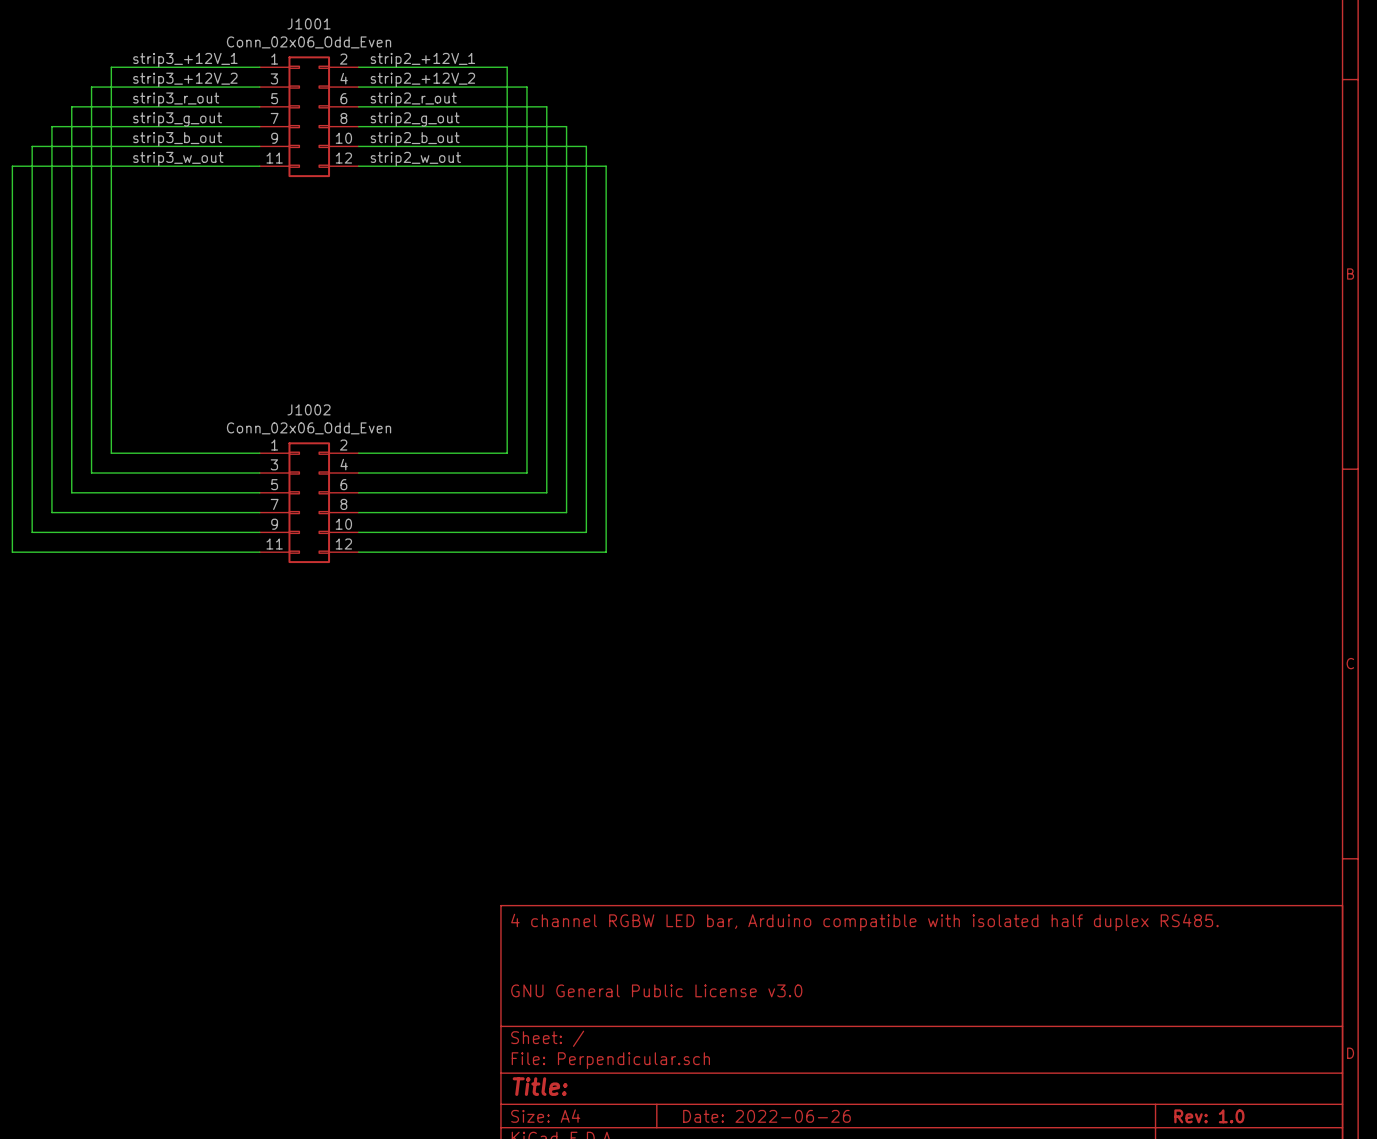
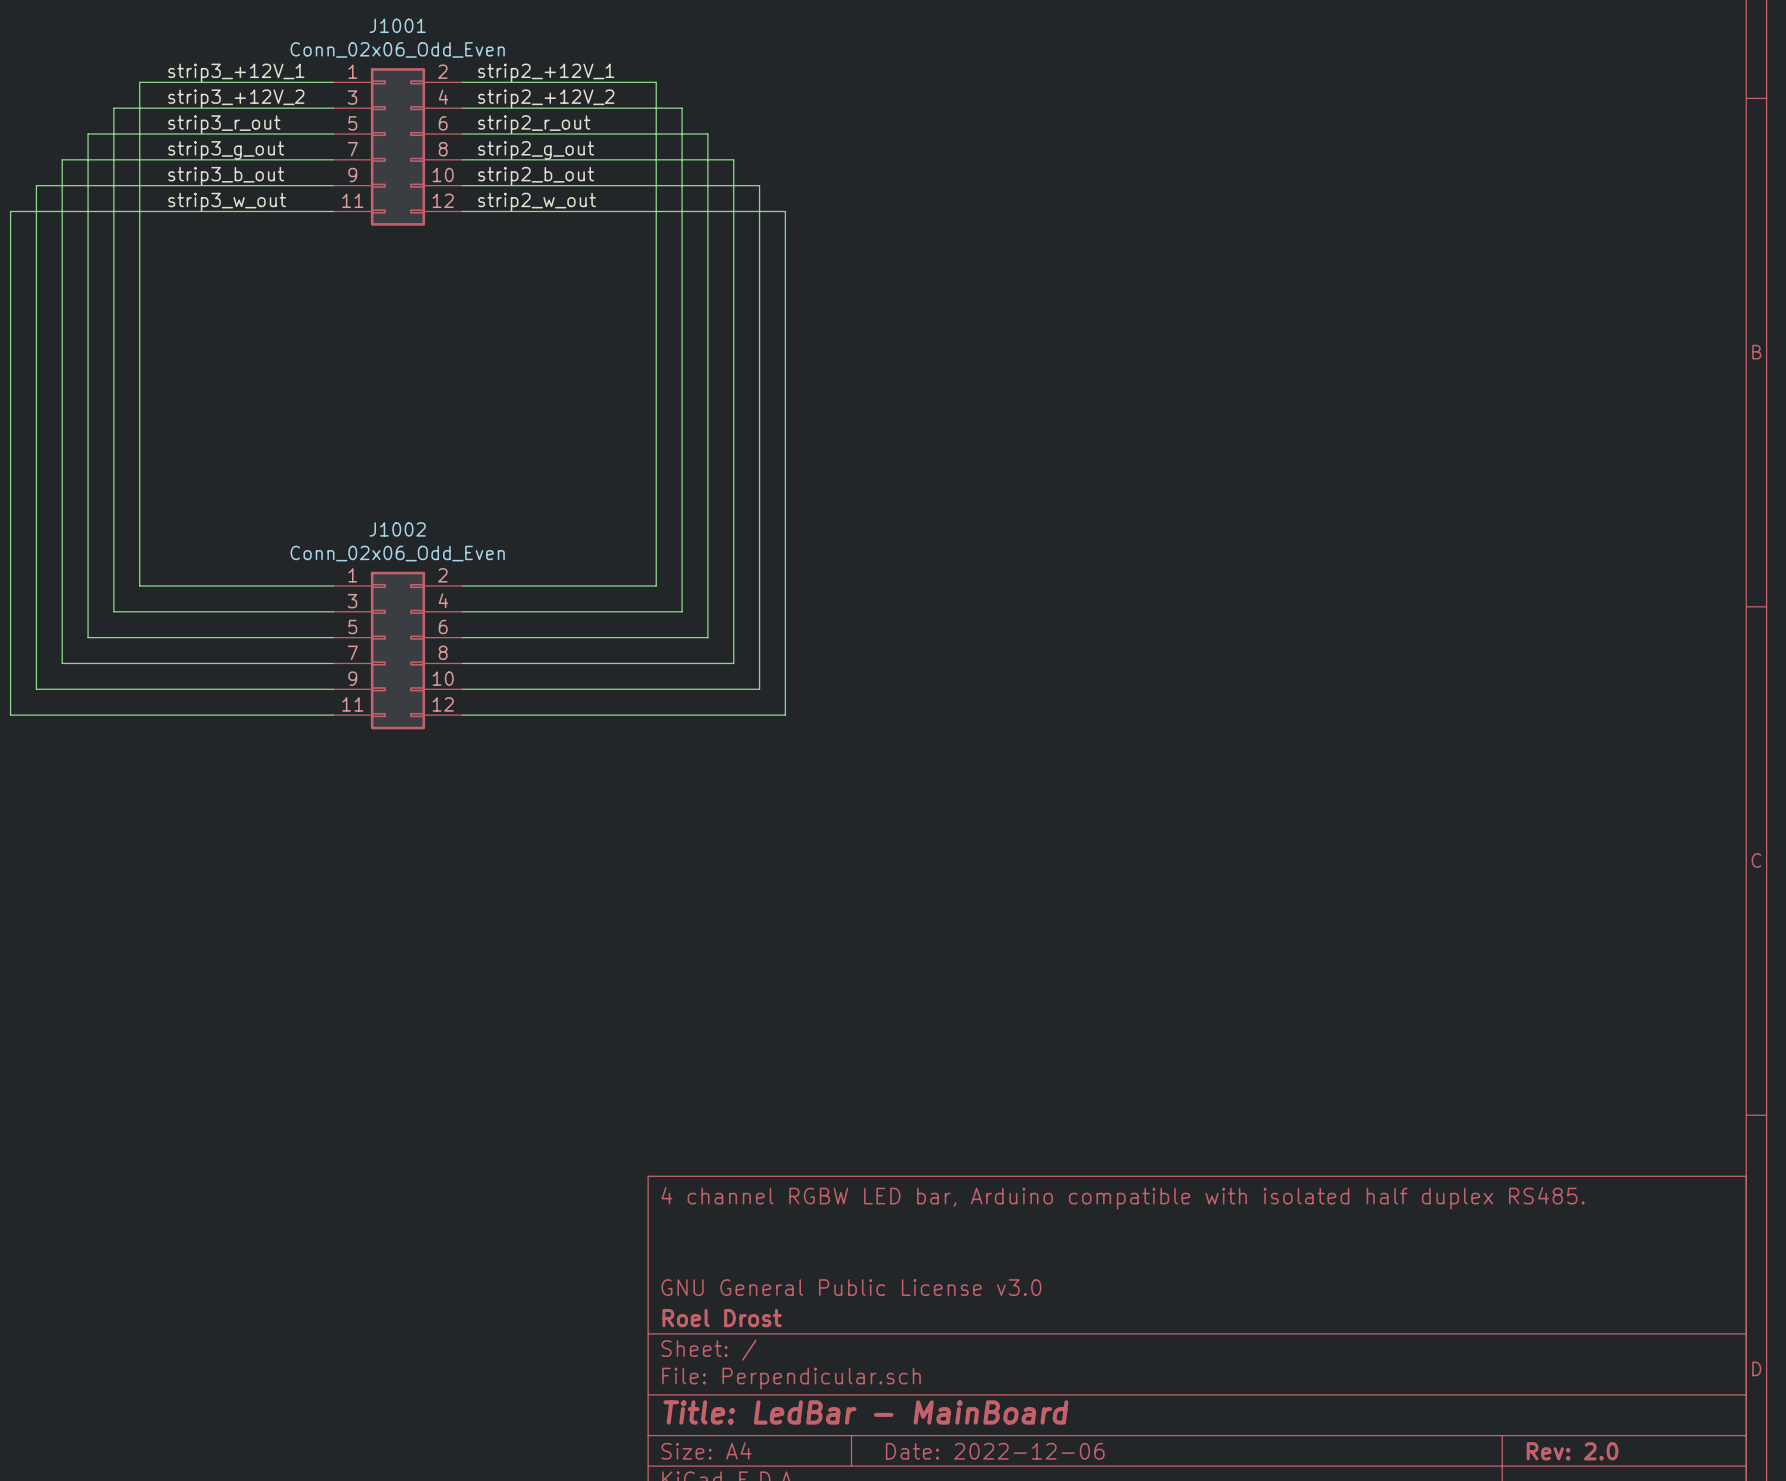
title block: none -> Roel Drost (722, 1318)
title block: Title: (540, 1086) -> Title: LedBar - MainBoard (865, 1412)
title block: Date: 2022-06-26 (766, 1116) -> Date: 2022-12-06 (995, 1451)
title block: Rev: 1.0 (1209, 1116) -> Rev: 2.0 (1572, 1451)

